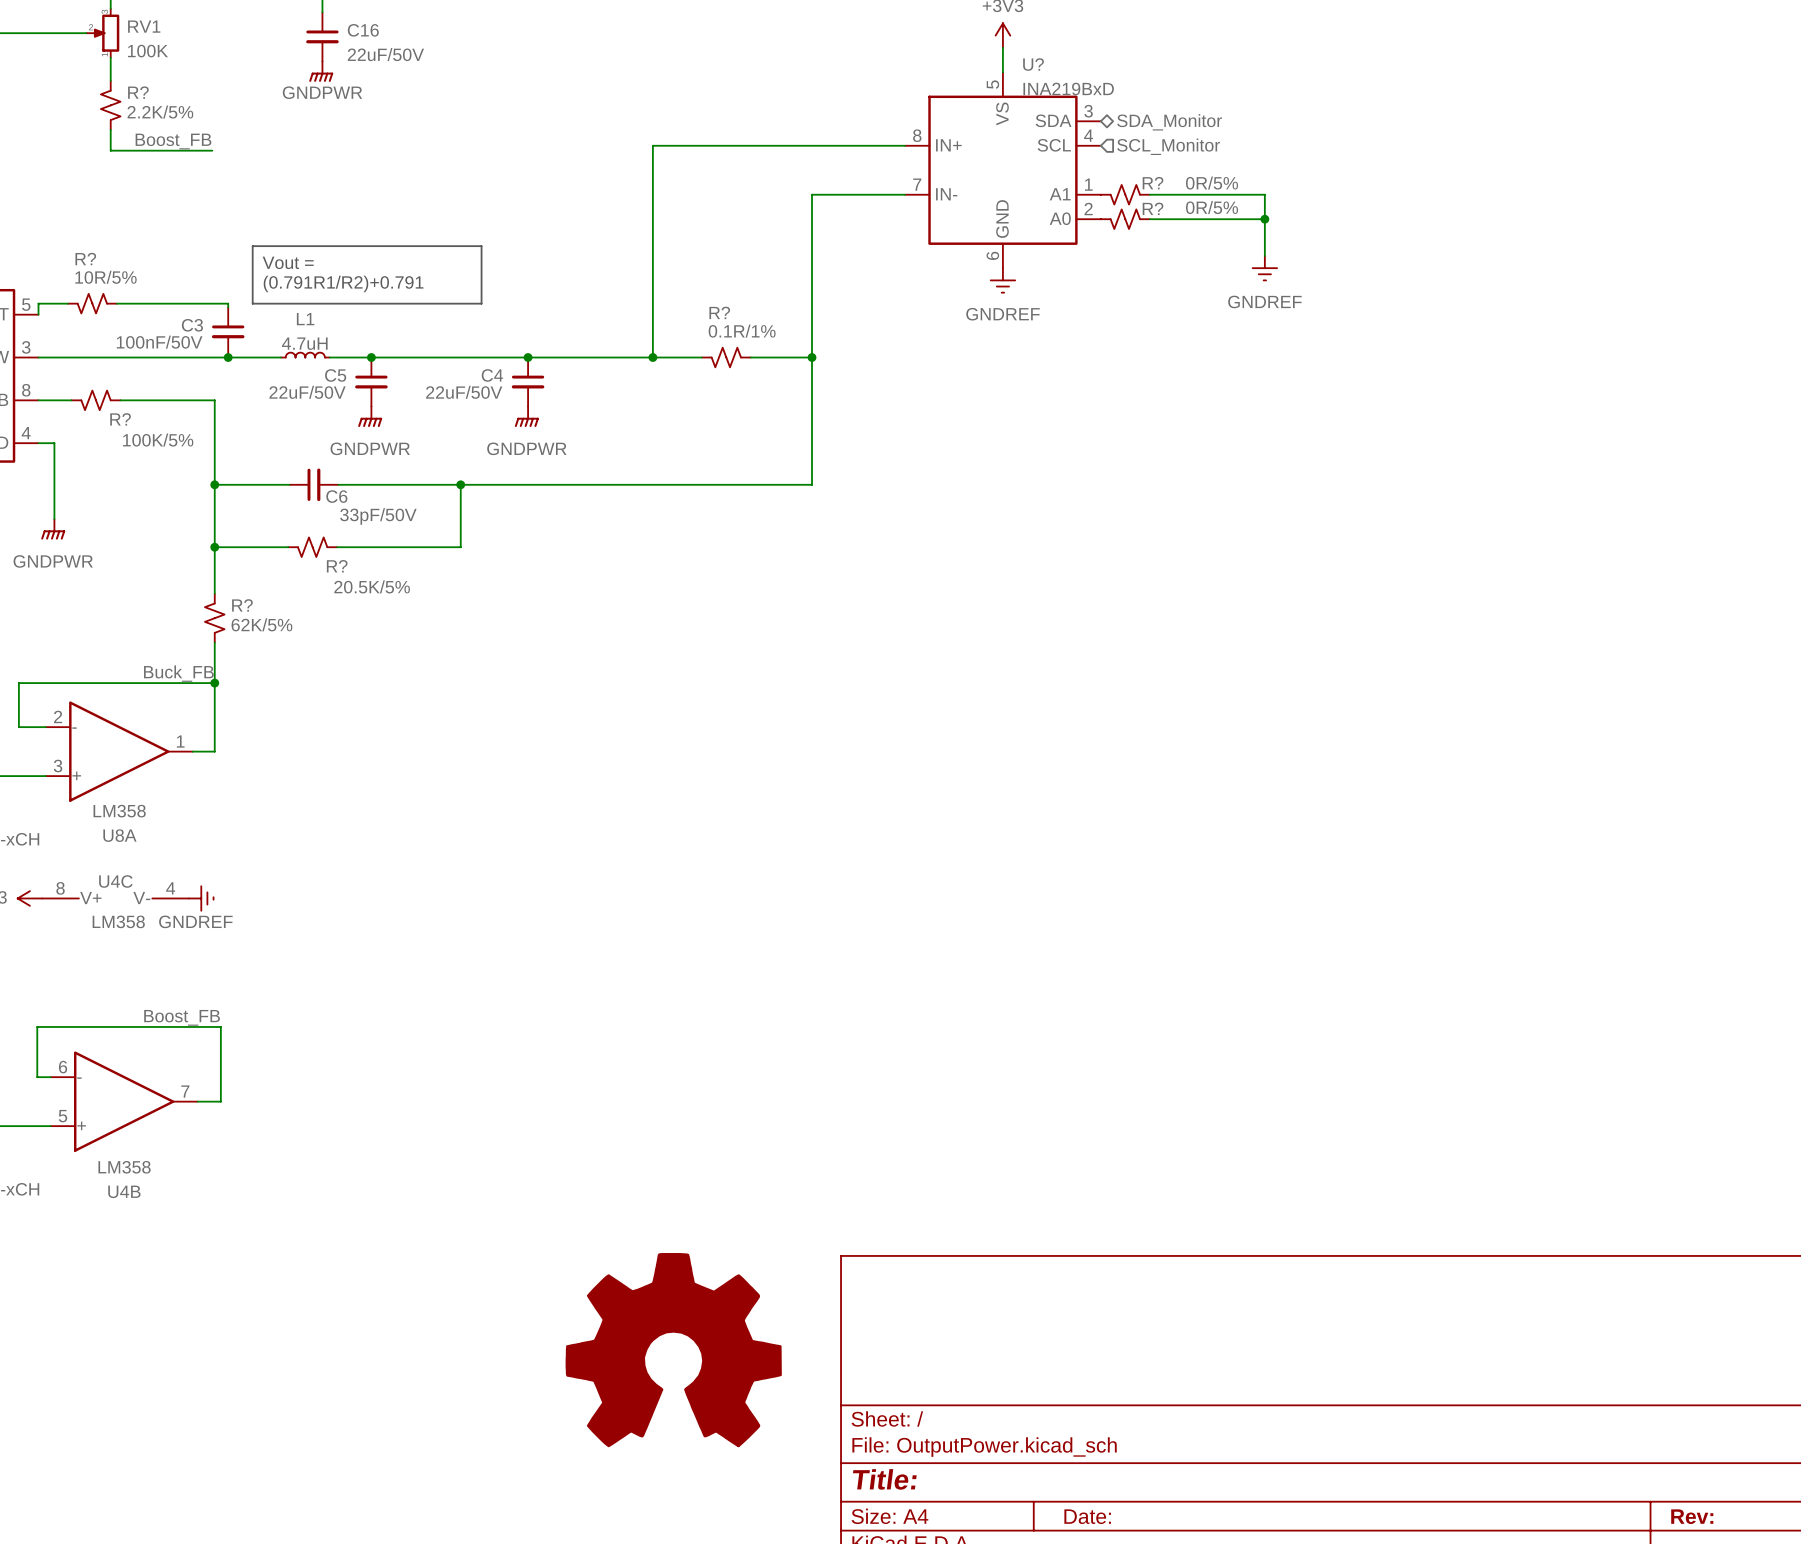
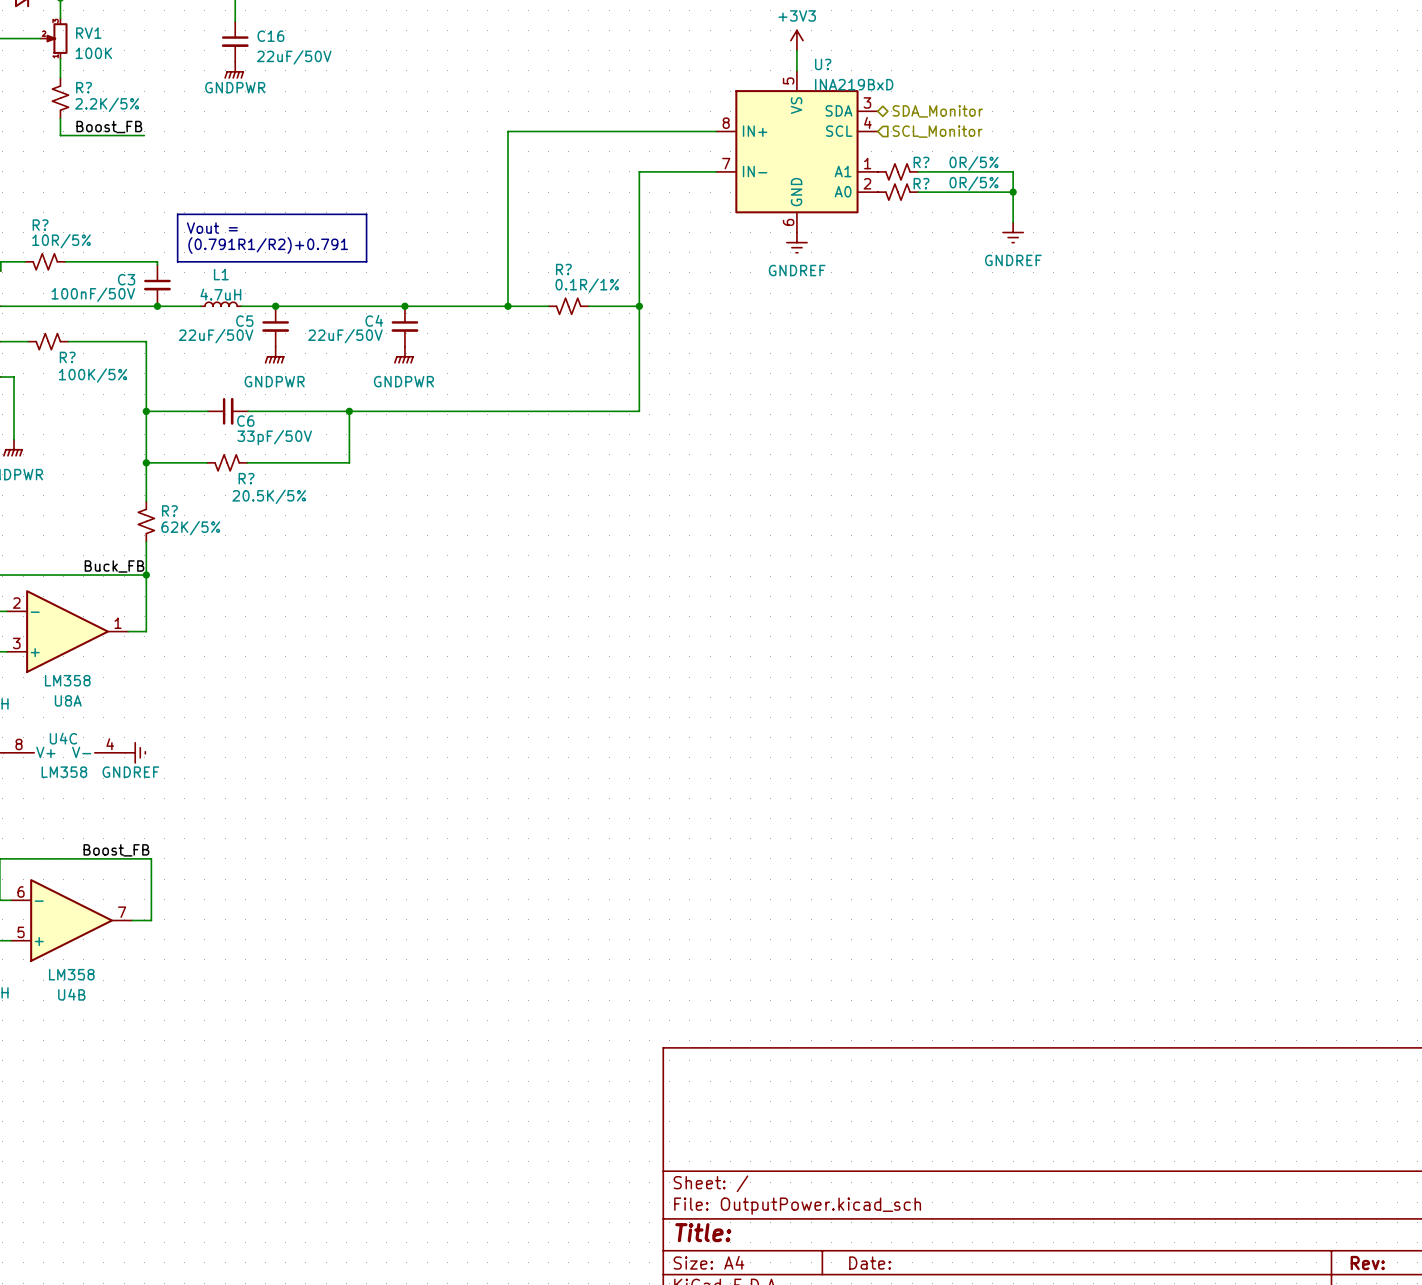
power symbol: (673, 1350) -> none

